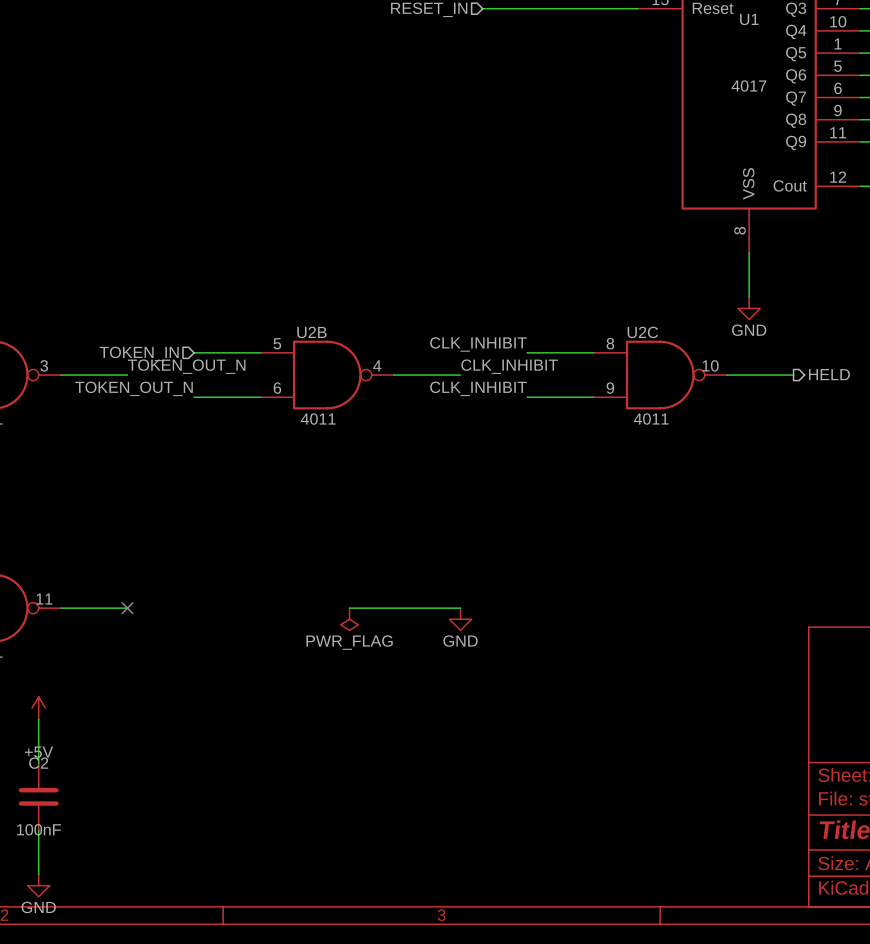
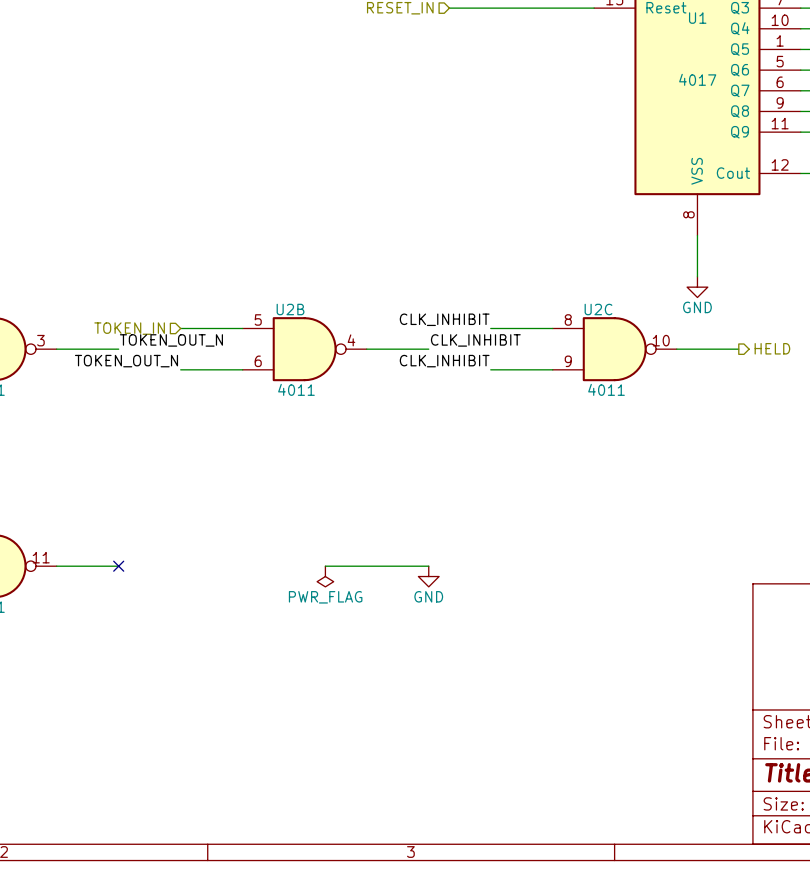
power symbol: +5V (38, 708) -> none
wire: (38, 719) (38, 763) -> none
C2: 100nF (38, 796) -> none
wire: (38, 830) (38, 874) -> none
power symbol: GND (38, 885) -> none

